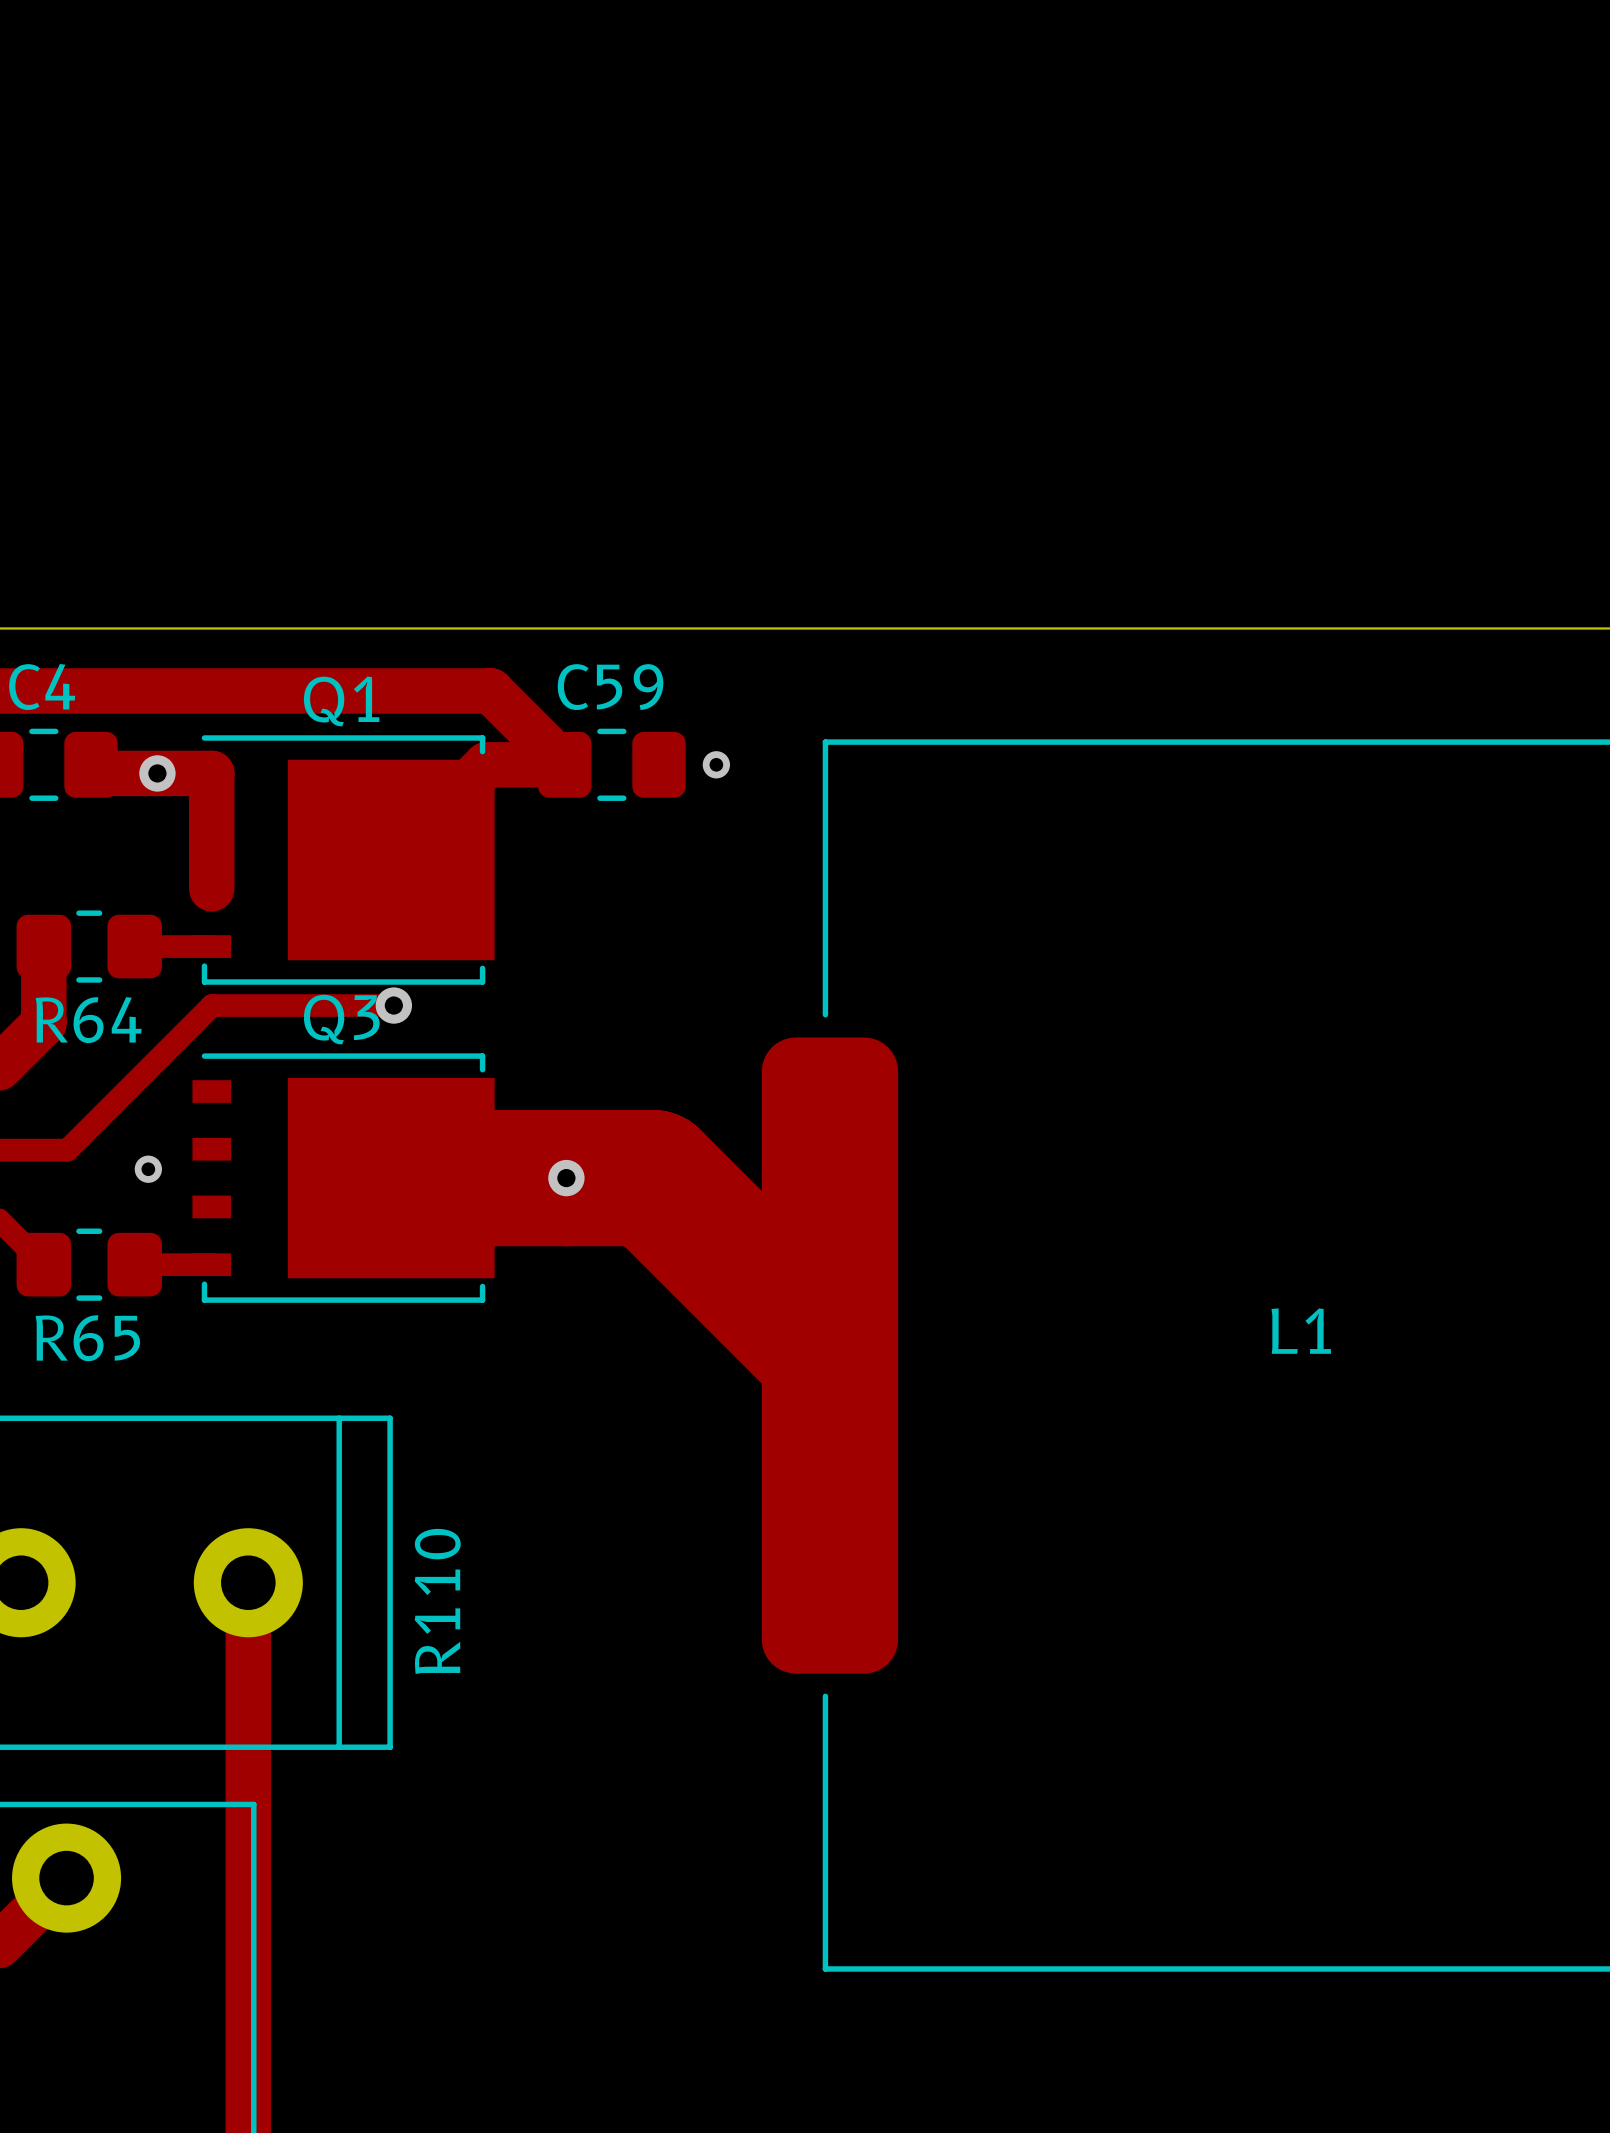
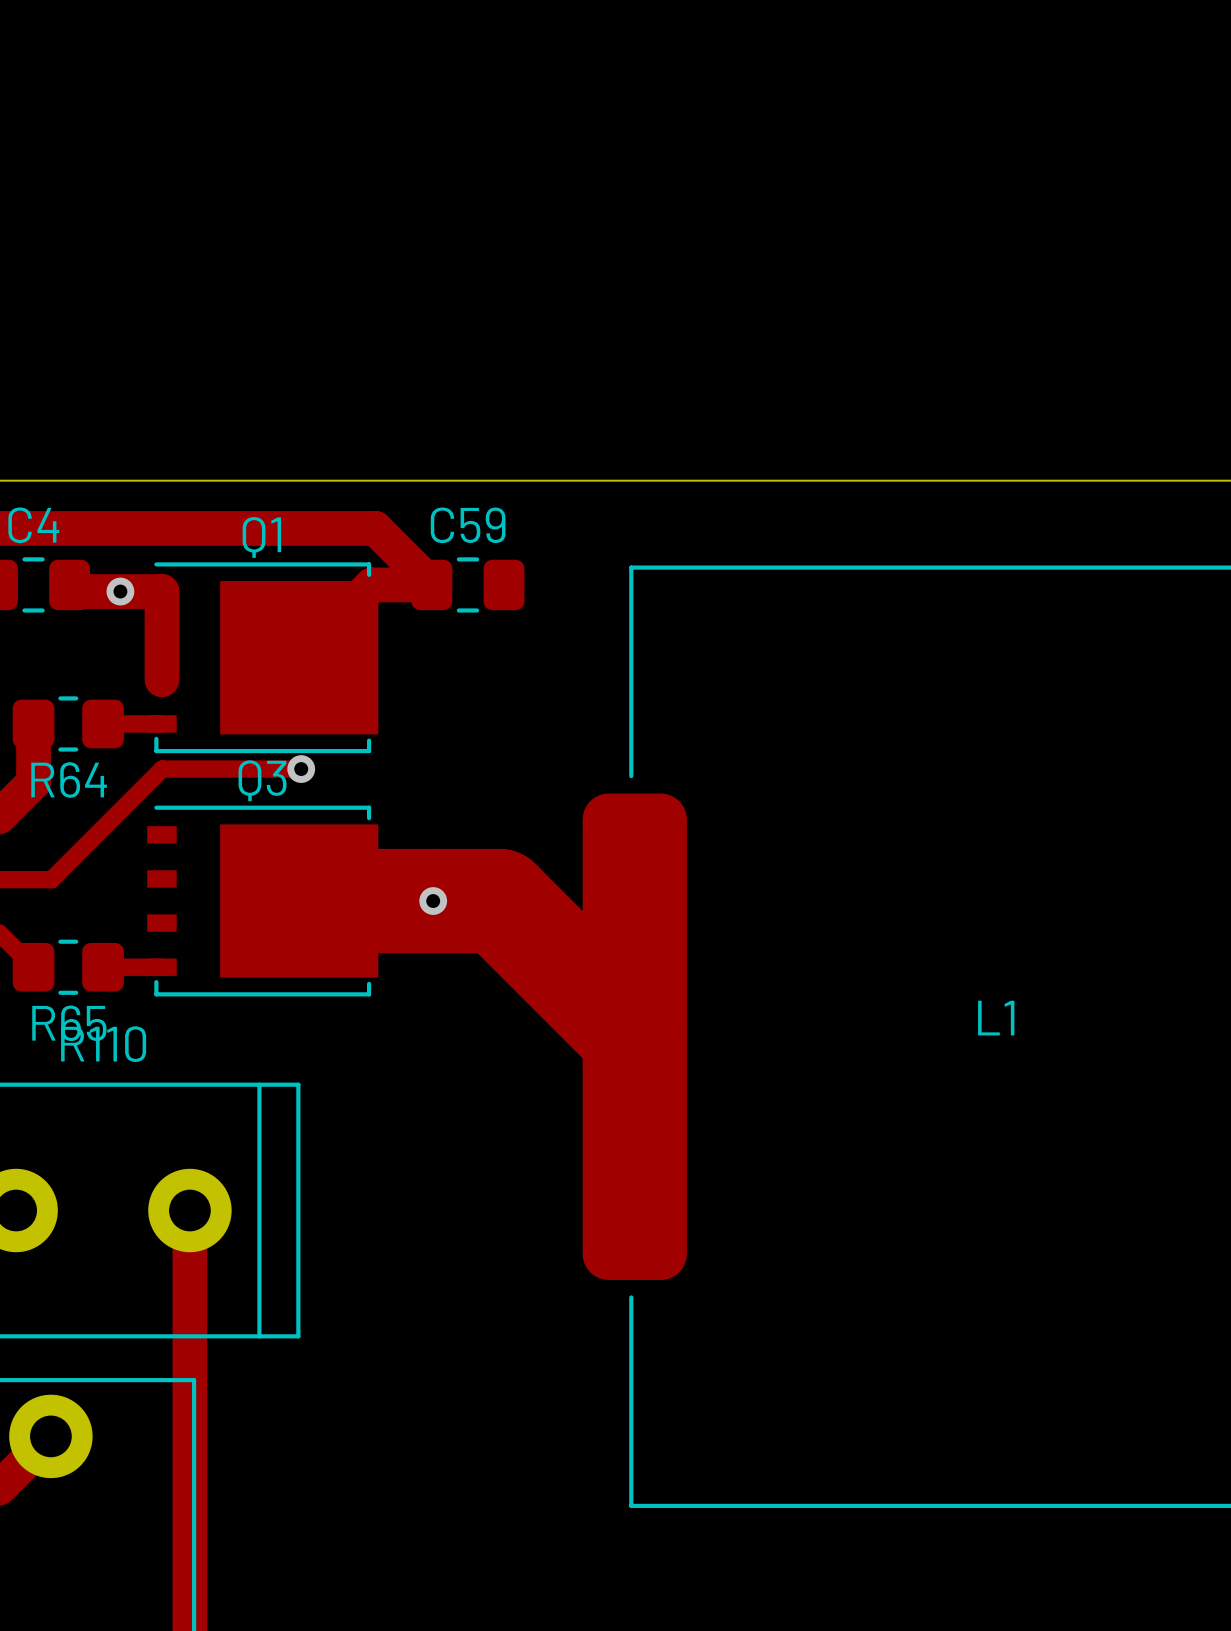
via: (716, 764) -> none
via: (148, 1169) -> none
R110 name rotation: 0° (437, 1601) -> 90° clockwise (103, 1044)
R110 name position: R110 (437, 1601) -> R110 (103, 1044)

